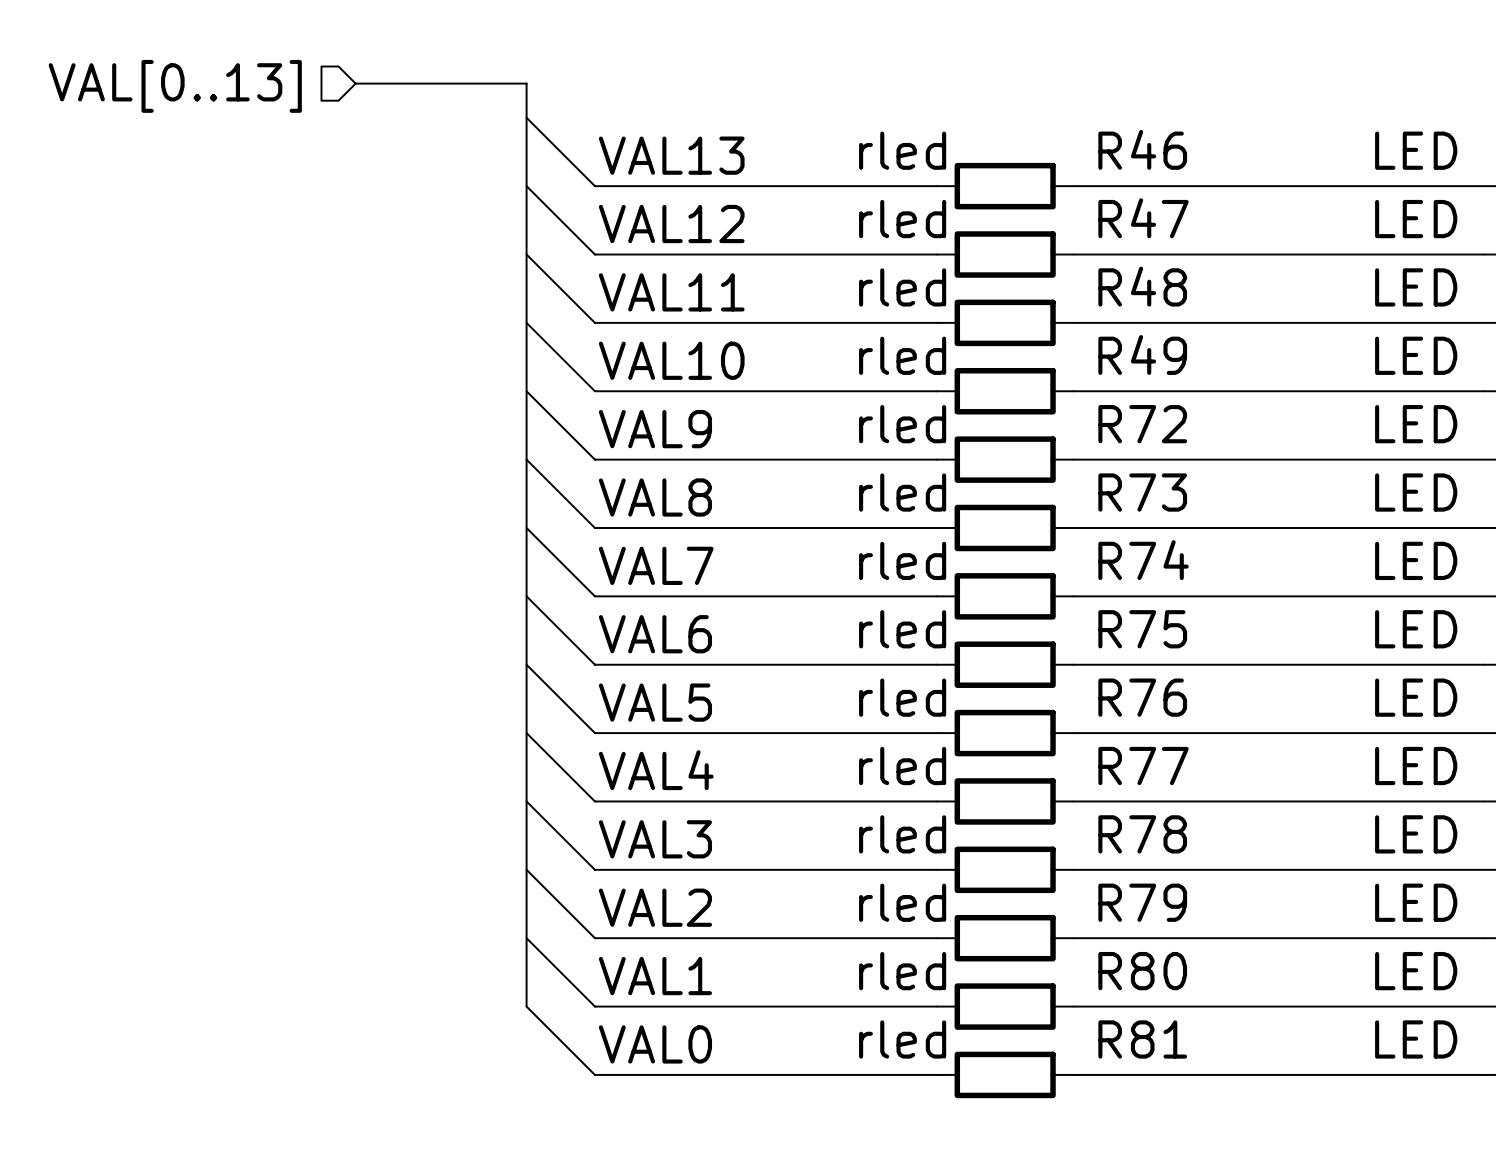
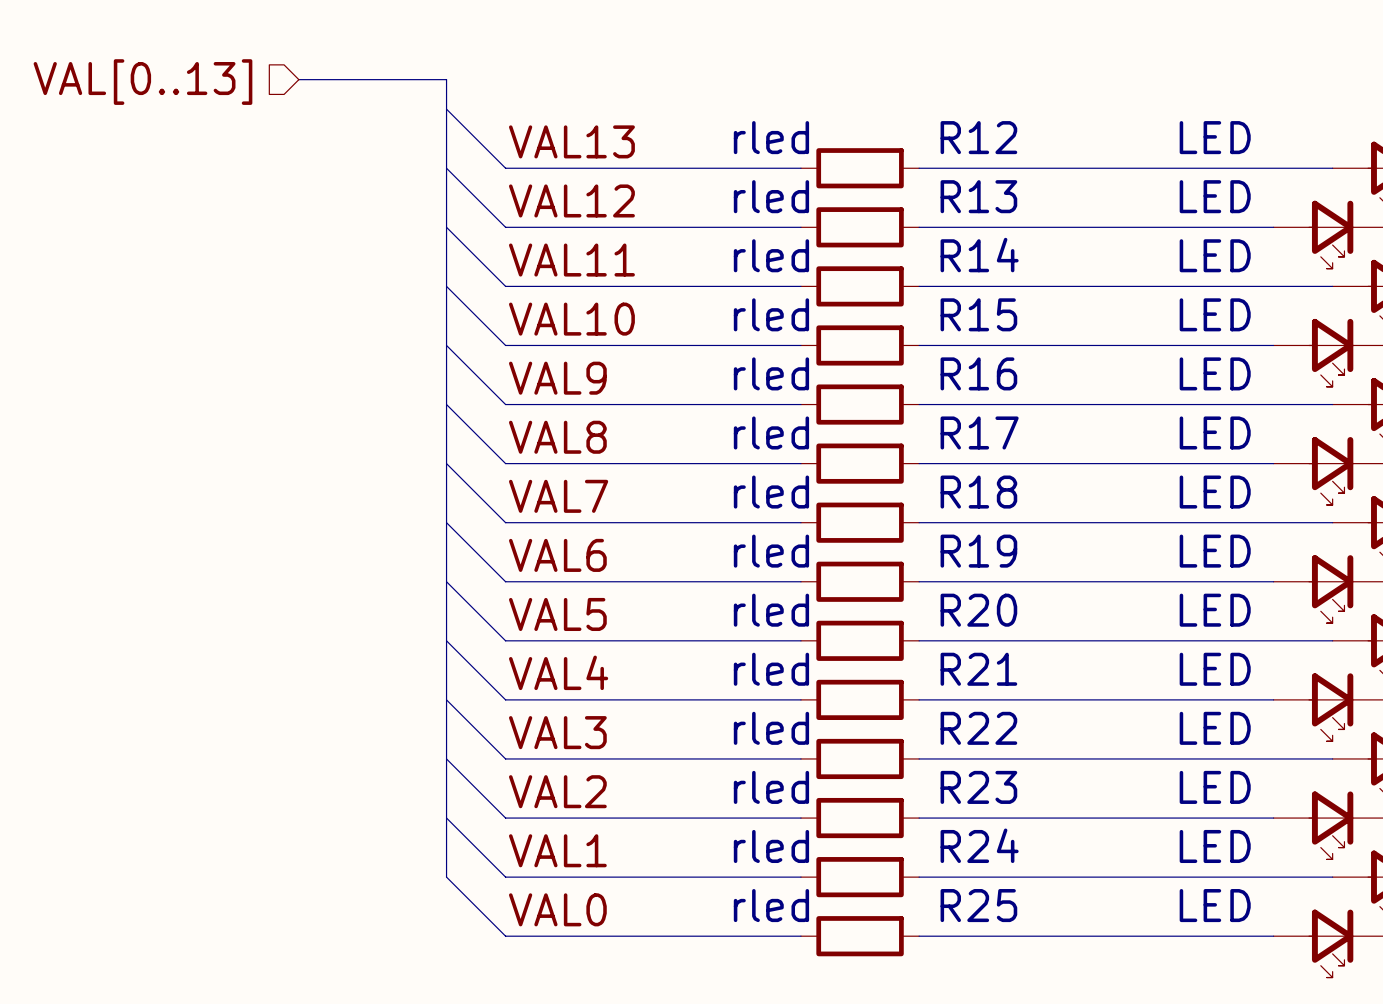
R46 name: R46 (1142, 149) -> R12 (978, 137)
R47 name: R47 (1143, 218) -> R13 (978, 196)
R48 name: R48 (1142, 286) -> R14 (979, 255)
R49 name: R49 (1142, 354) -> R15 (978, 314)
R72 name: R72 (1142, 424) -> R16 (978, 373)
R73 name: R73 (1142, 492) -> R17 (979, 432)
R74 name: R74 (1143, 560) -> R18 (978, 492)
R75 name: R75 (1142, 629) -> R19 (978, 551)
R76 name: R76 (1142, 697) -> R20 (978, 610)
R77 name: R77 (1143, 766) -> R21 (978, 669)
R78 name: R78 (1142, 834) -> R22 (978, 728)
R79 name: R79 (1142, 902) -> R23 (978, 787)
R80 name: R80 (1142, 971) -> R24 (979, 845)
R81 name: R81 (1142, 1039) -> R25 (978, 905)

